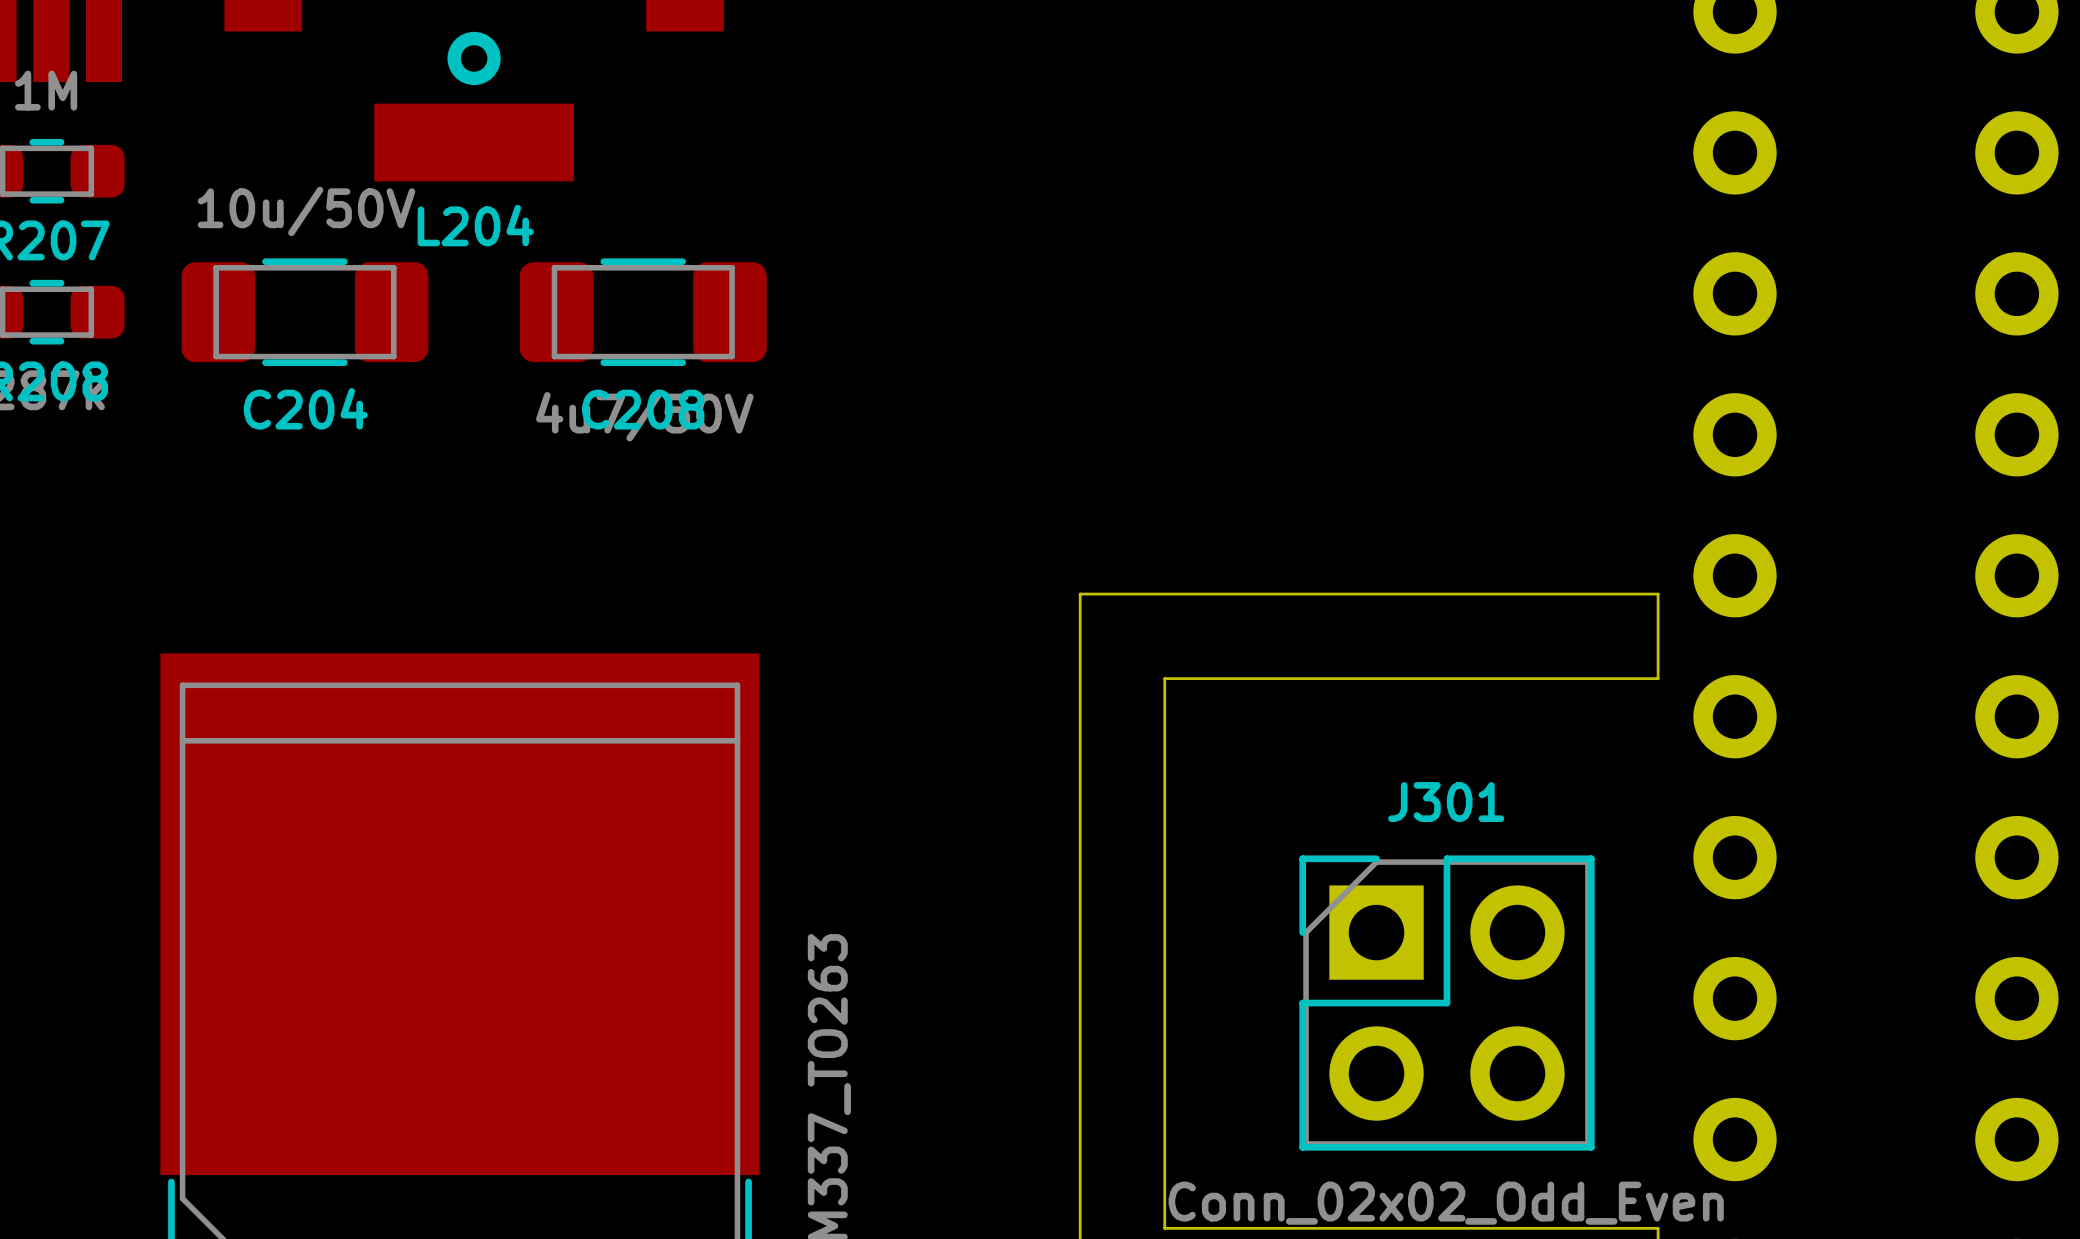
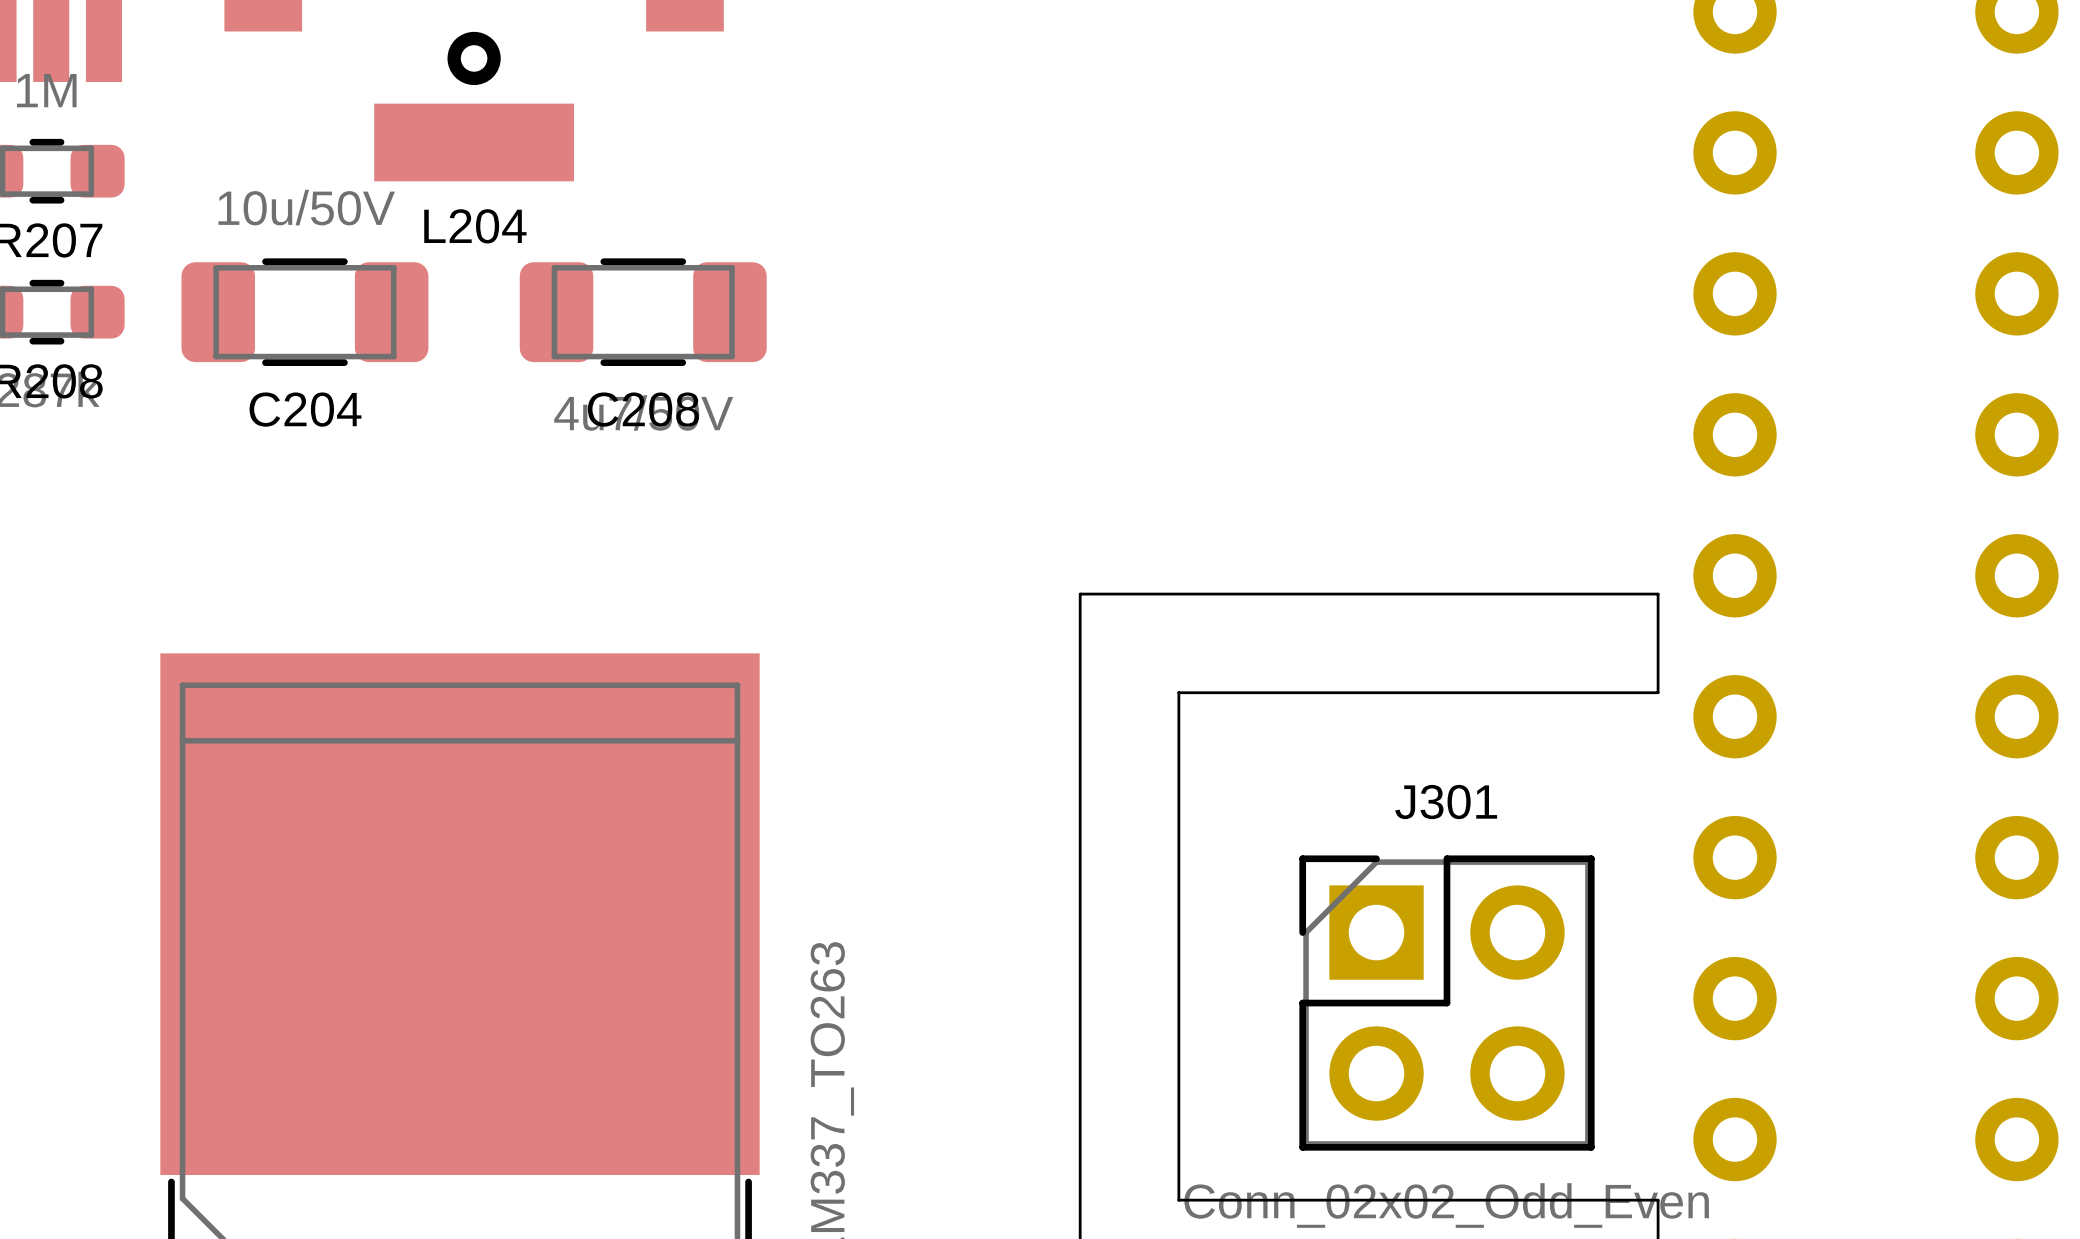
board edge: (1658, 678) (1164, 678) (1164, 1228) (1658, 1228) -> (1658, 678) (1658, 692) (1178, 692) (1178, 1200) (1658, 1200) (1658, 1228)

